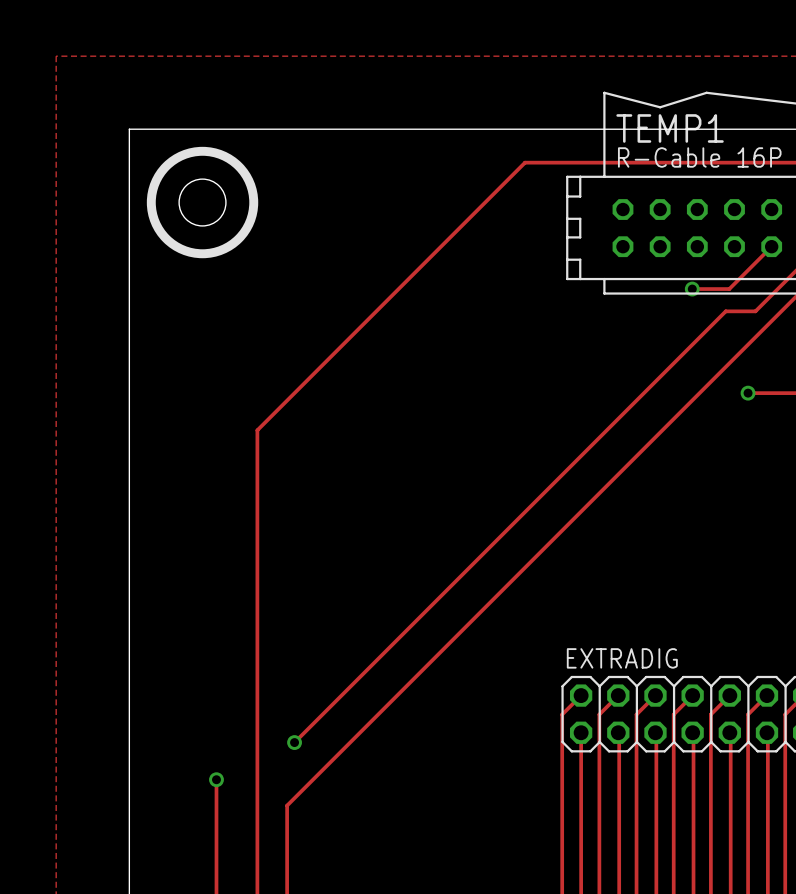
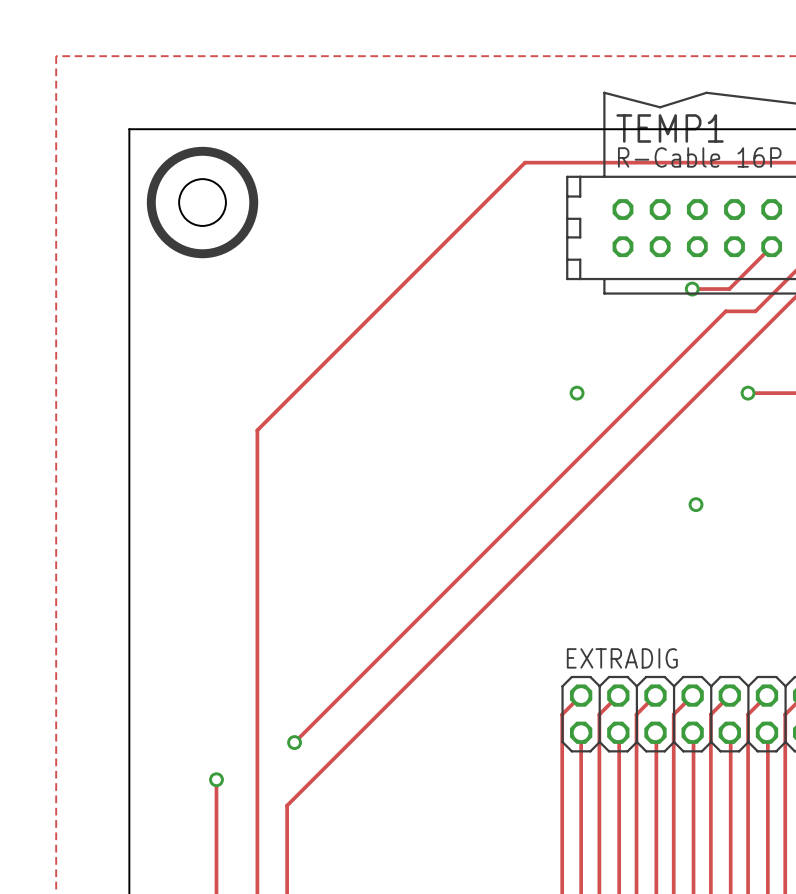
via: none -> (577, 393)
via: none -> (696, 504)

